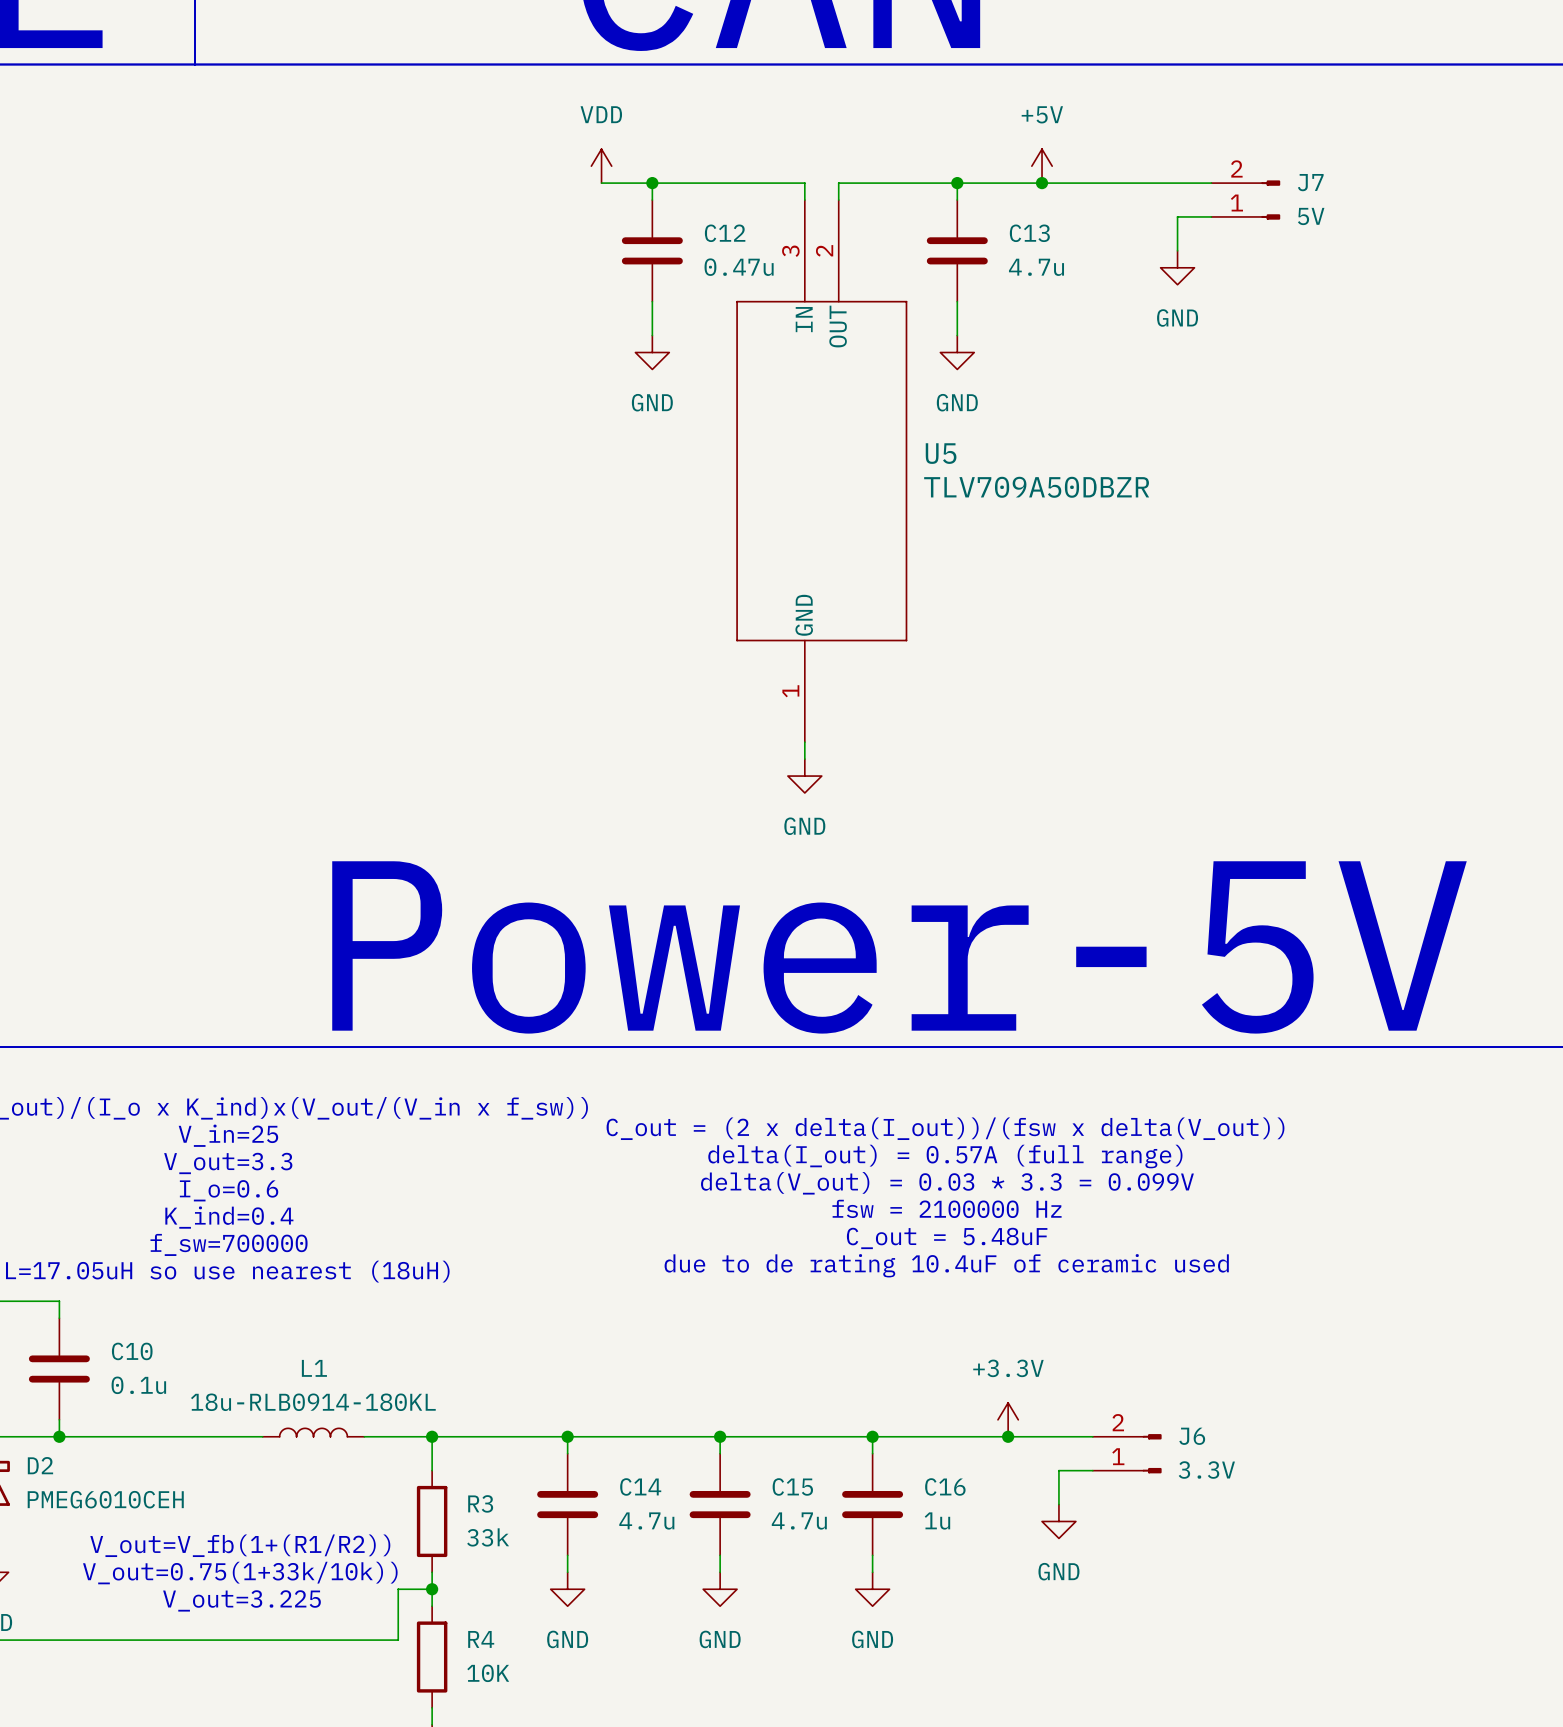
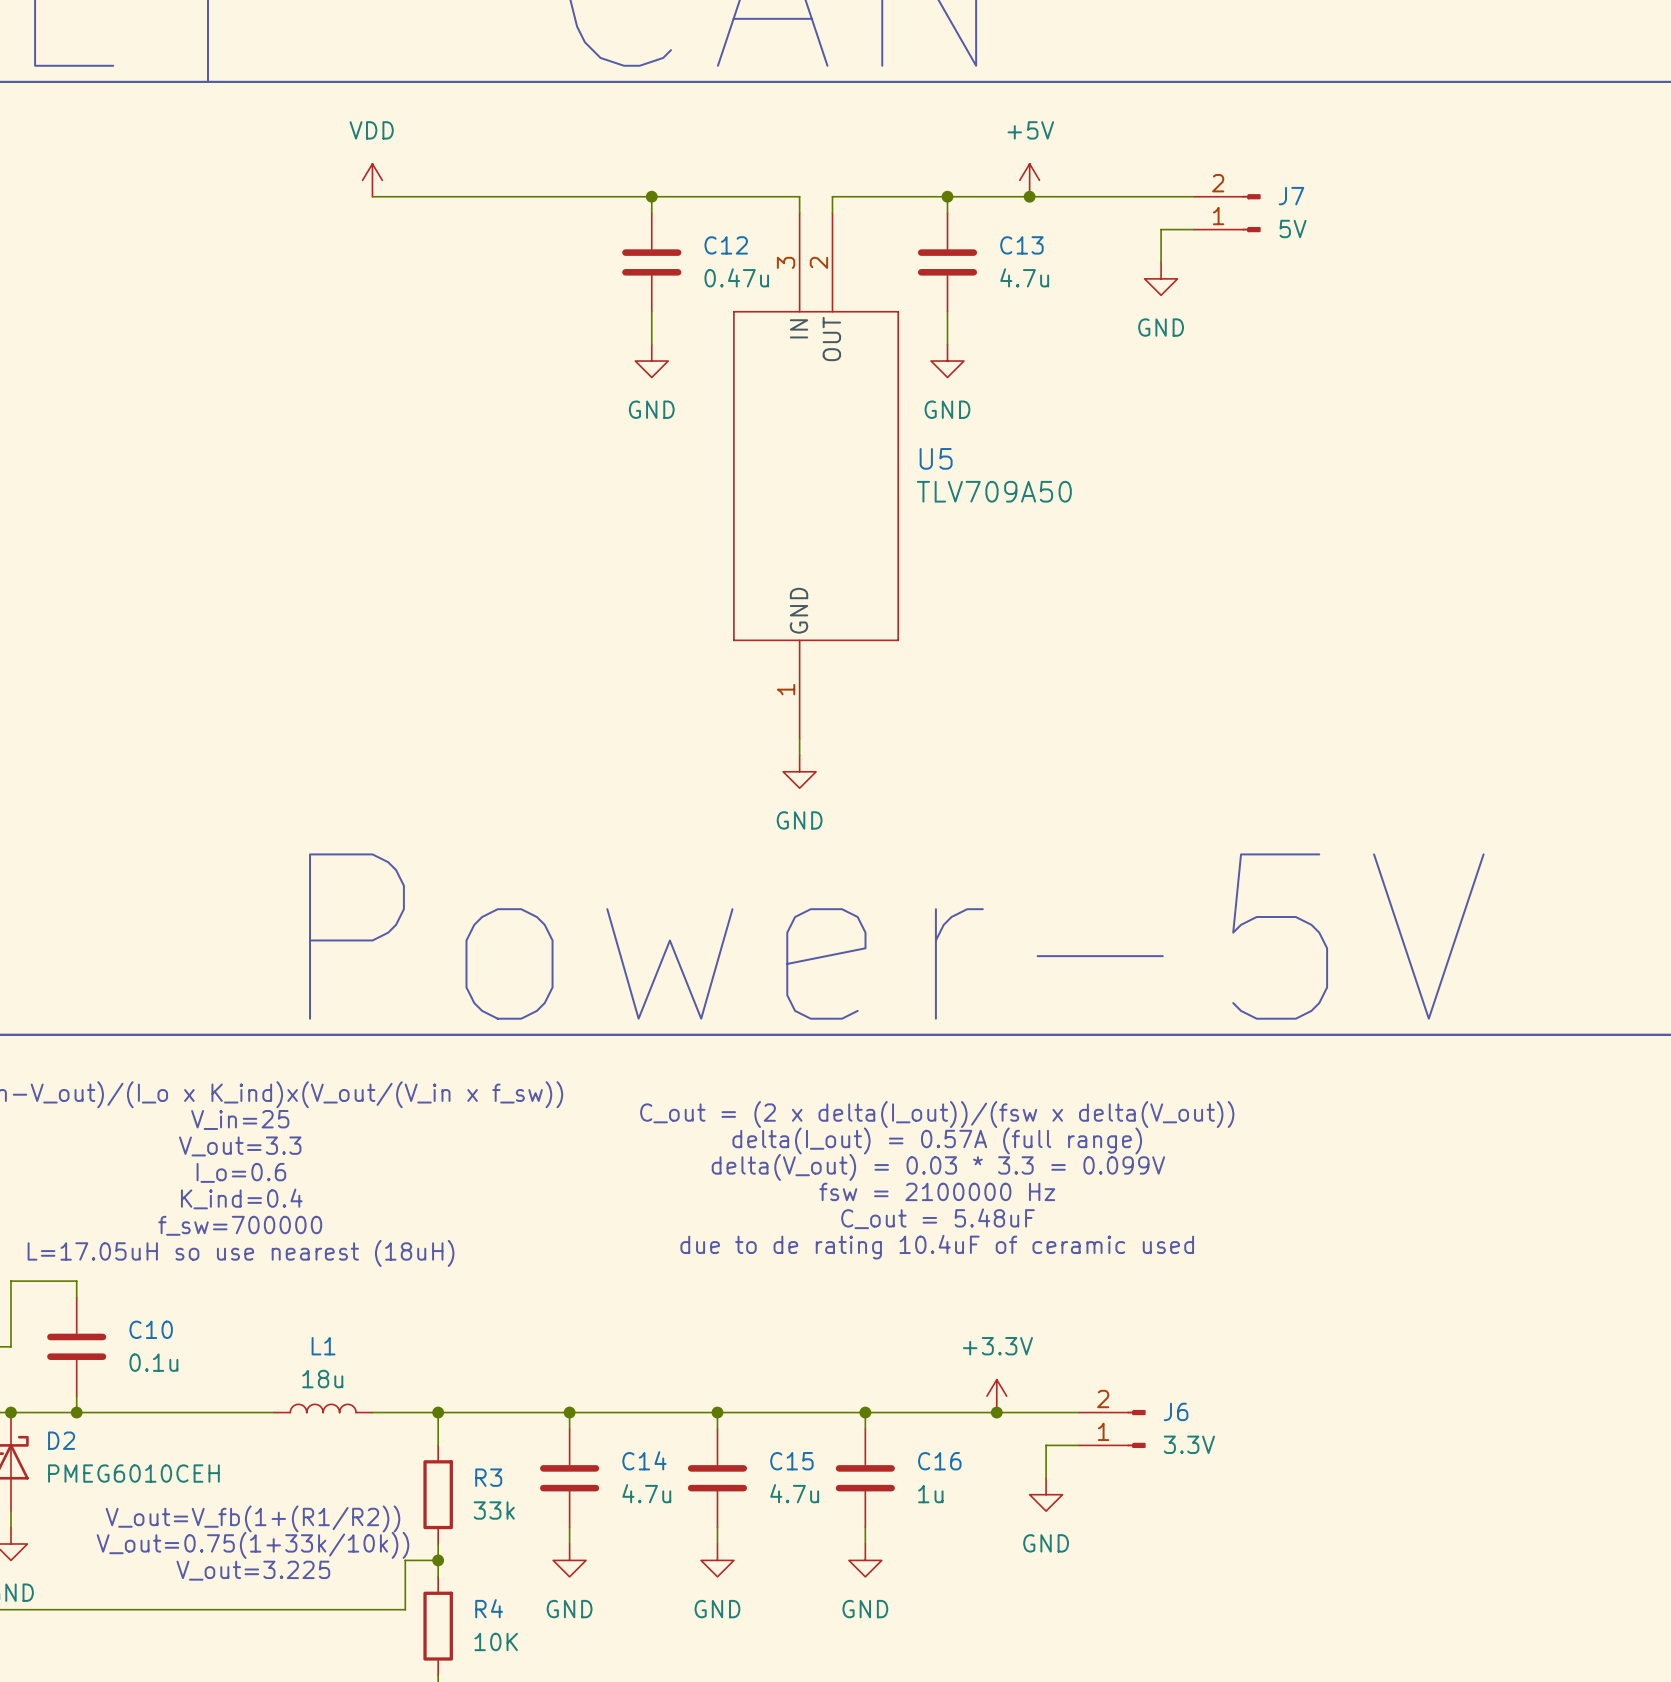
power symbol position: VDD (601, 166) -> VDD (372, 180)
wire: none -> (372, 196) (602, 196)
U5 value: TLV709A50DBZR (1036, 487) -> TLV709A50 (994, 491)
L1 value: 18u-RLB0914-180KL (313, 1402) -> 18u (322, 1379)

